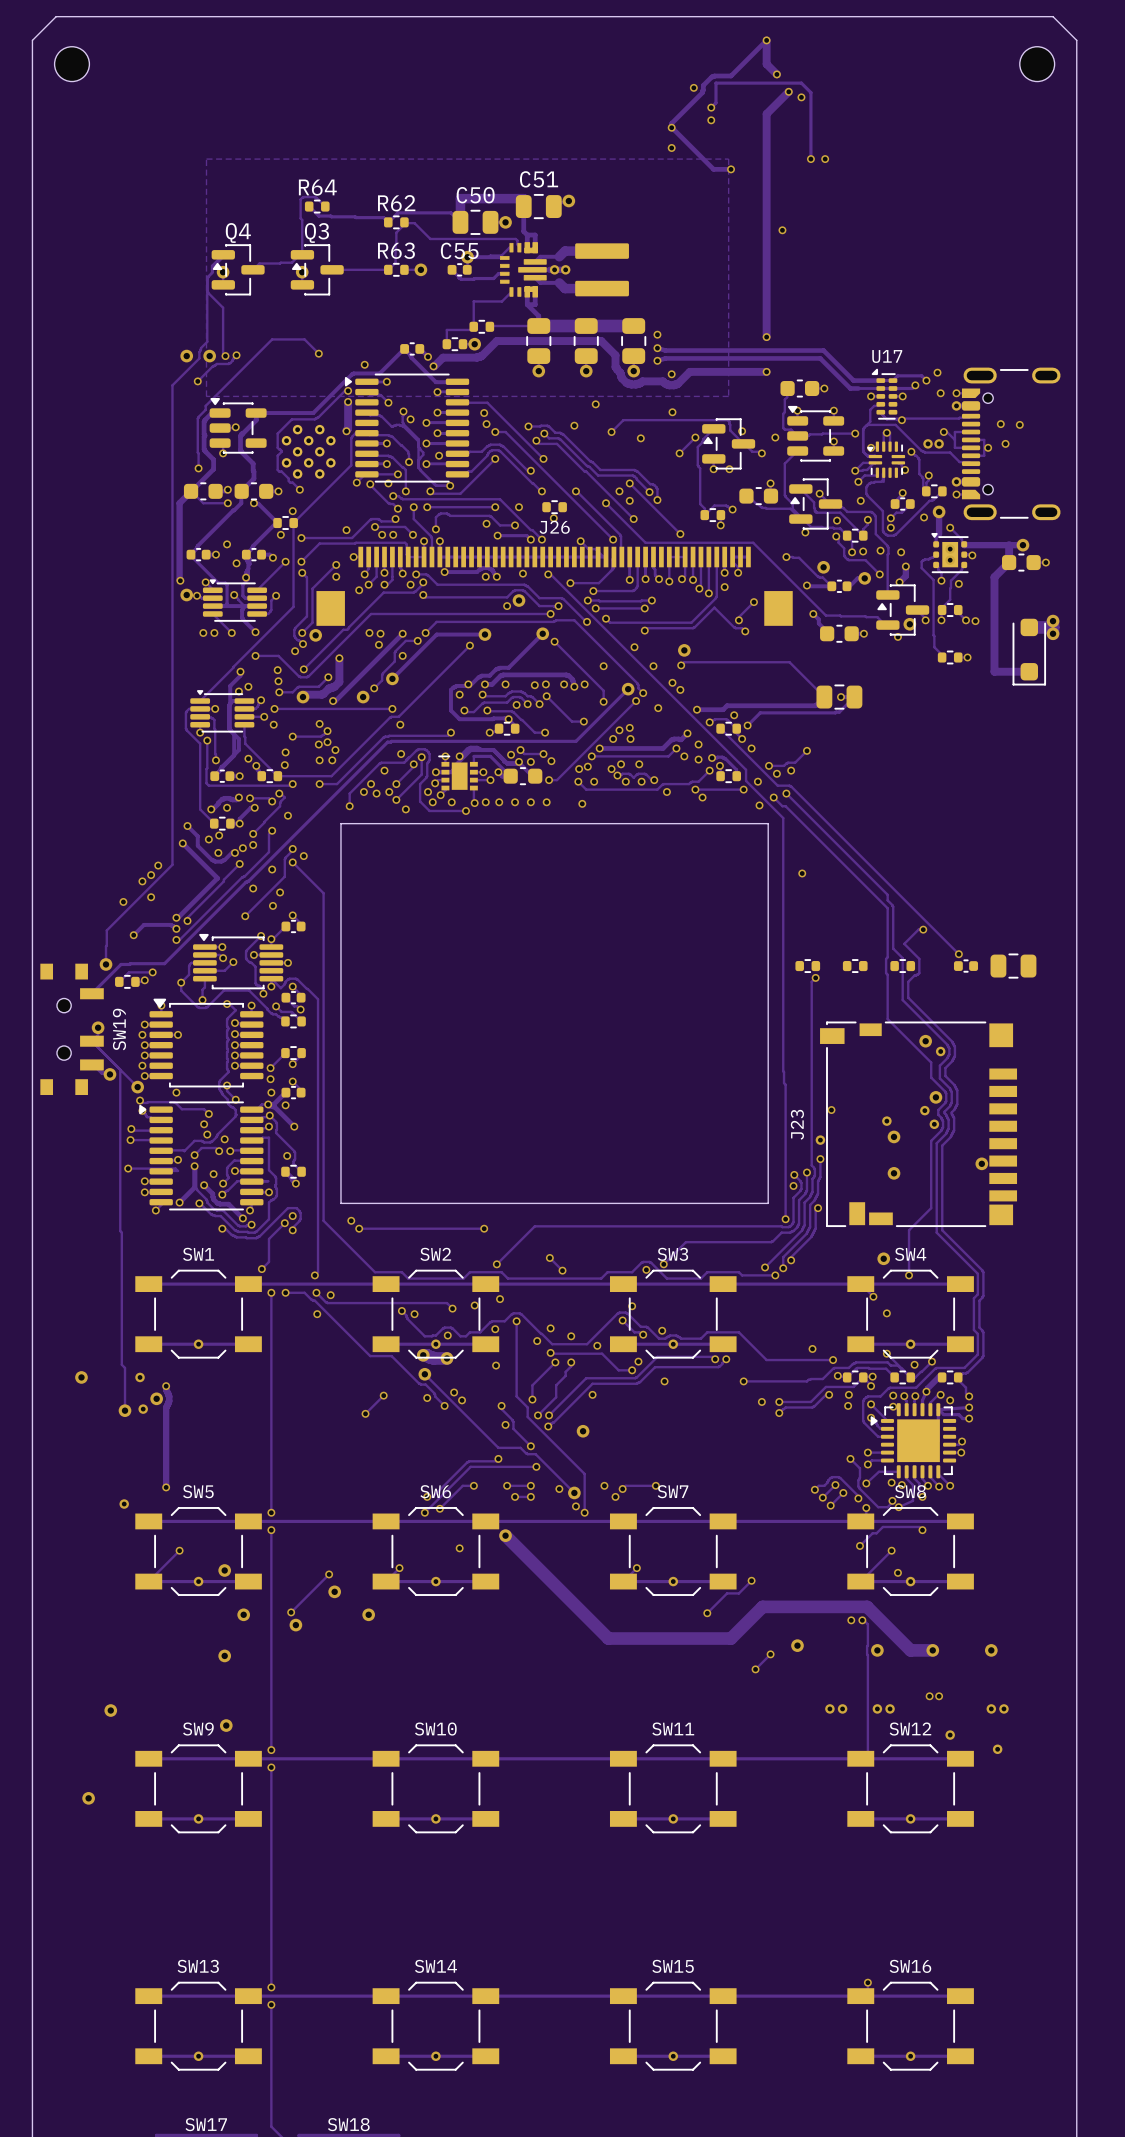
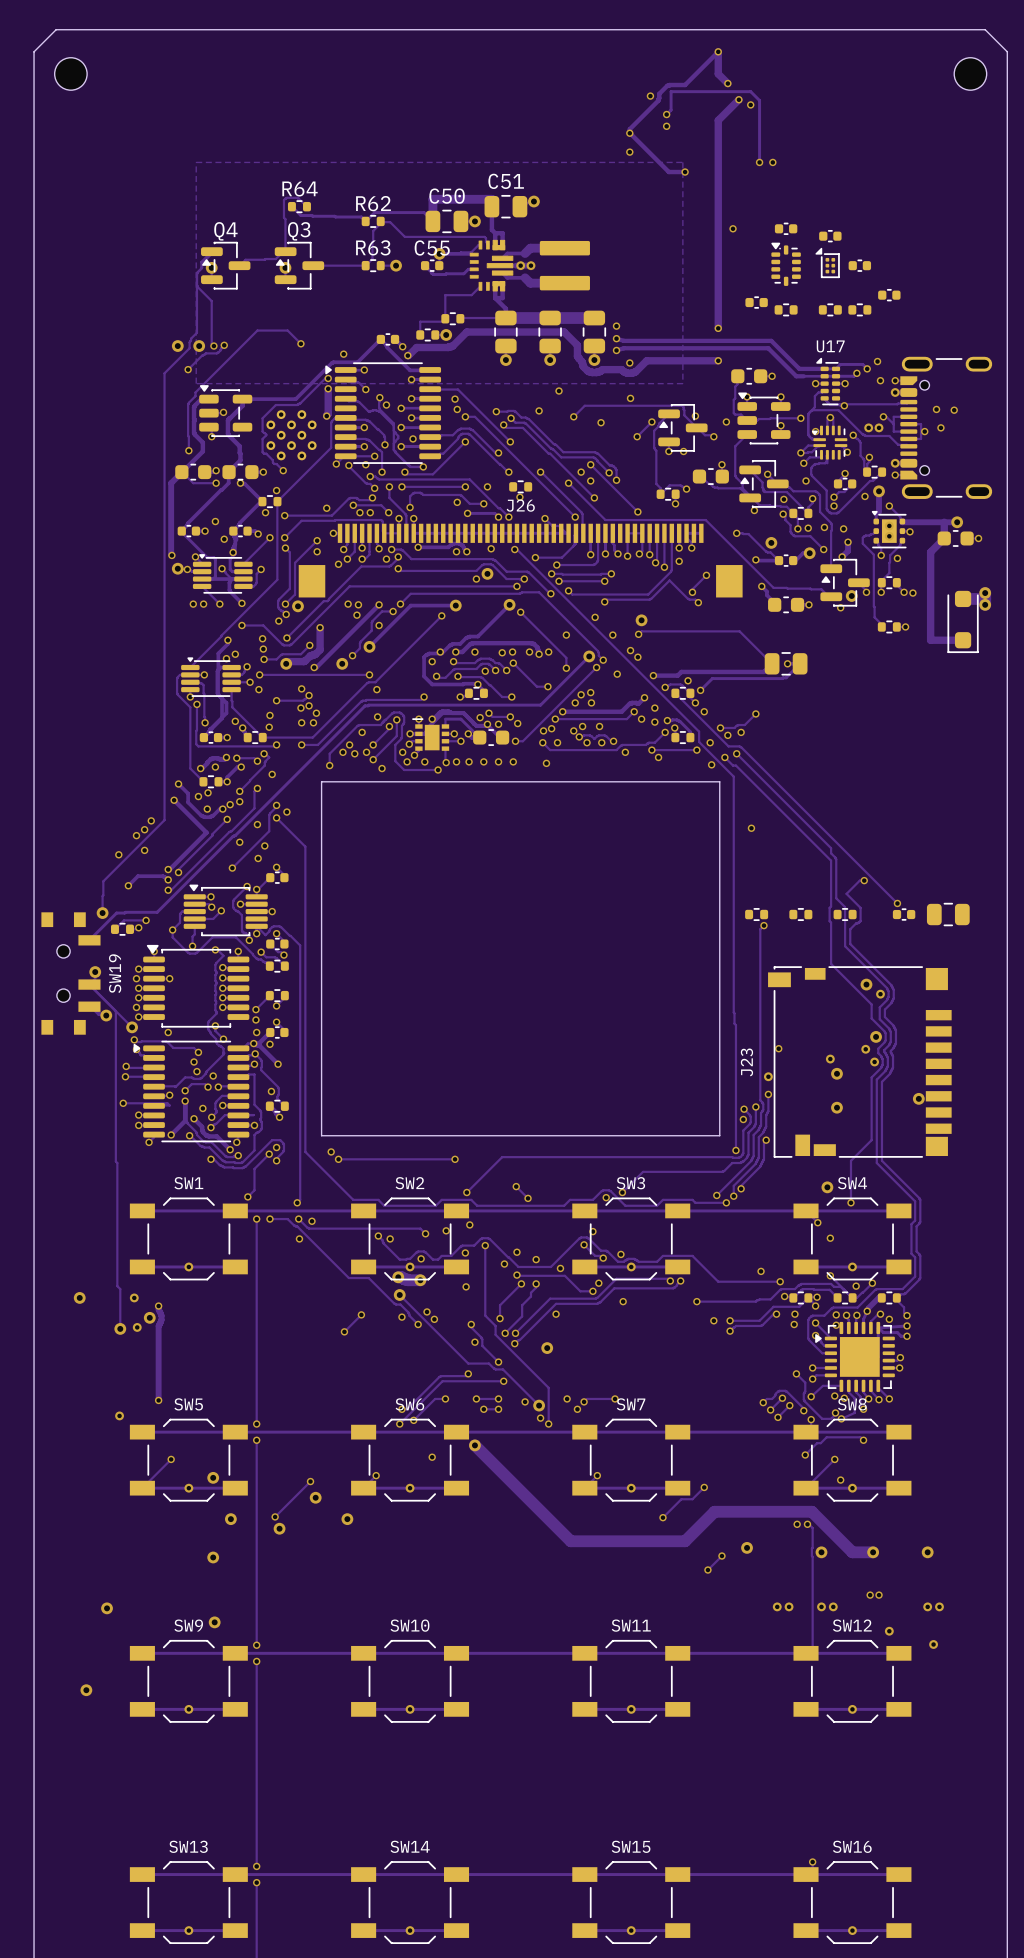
part: none -> (786, 228)
part: none -> (830, 236)
part: none -> (827, 262)
part: none -> (786, 264)
part: none -> (859, 265)
part: none -> (889, 295)
part: none -> (756, 302)
part: none -> (786, 309)
part: none -> (830, 309)
part: none -> (859, 309)

